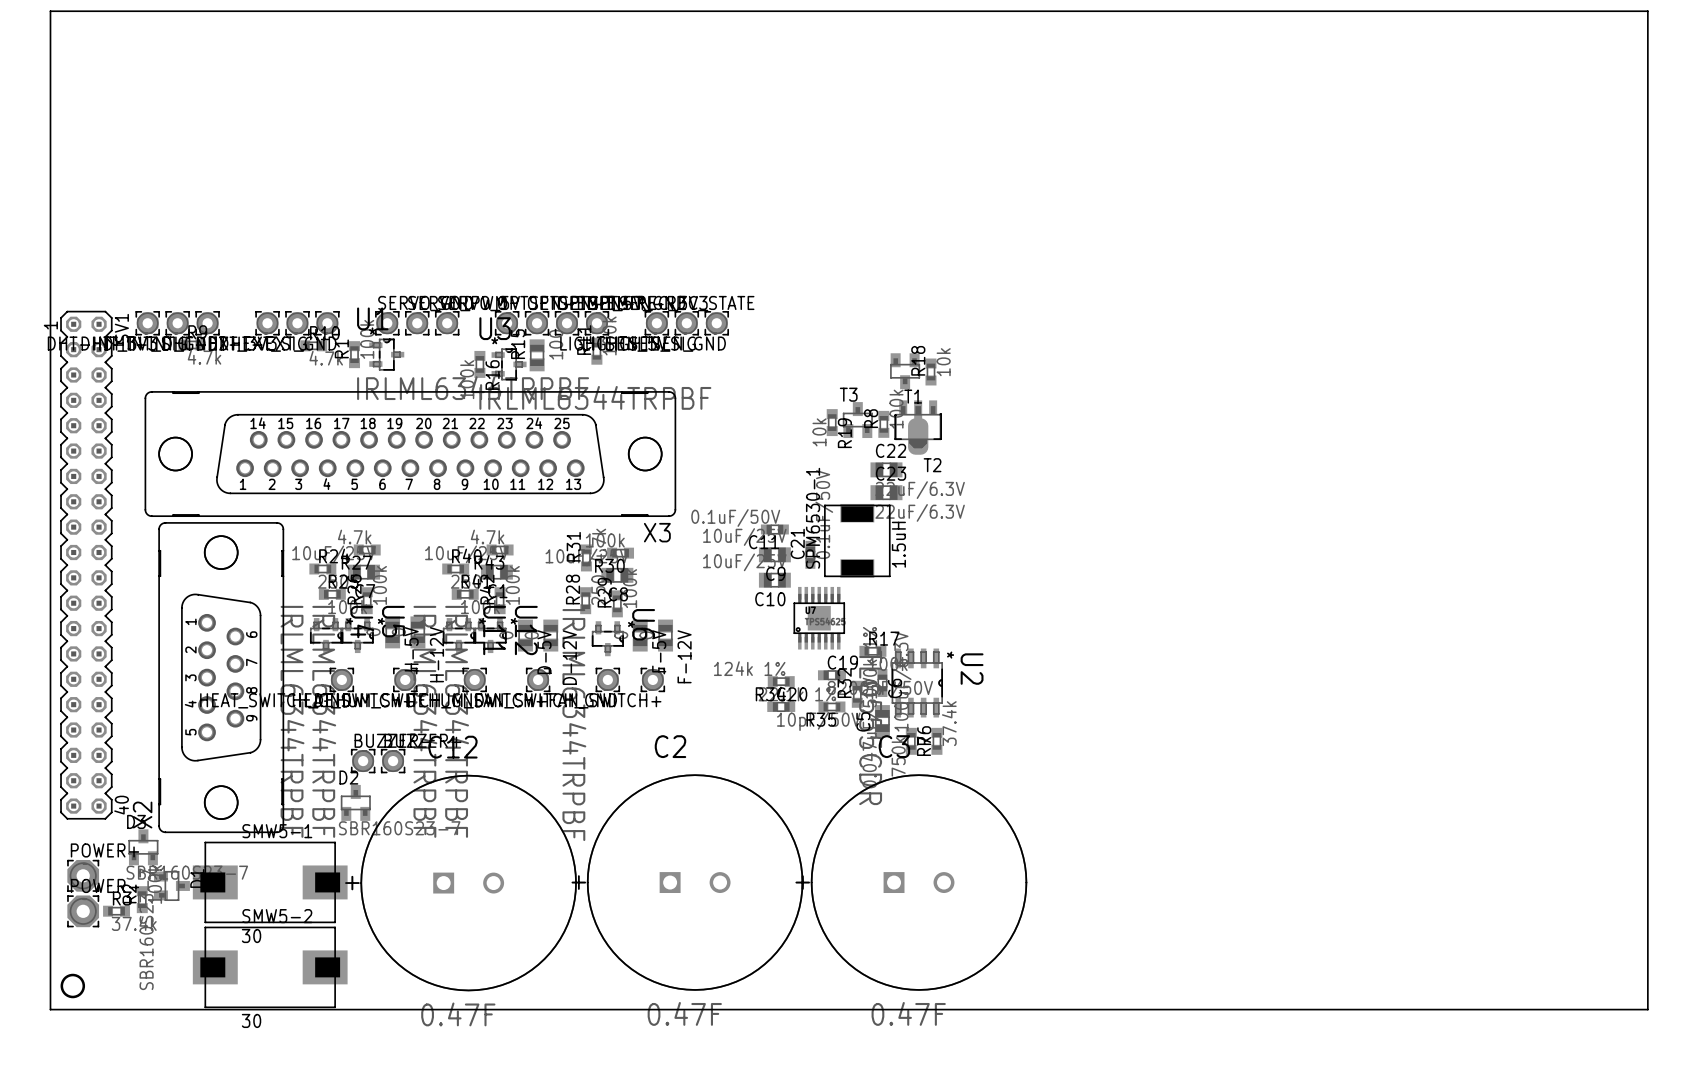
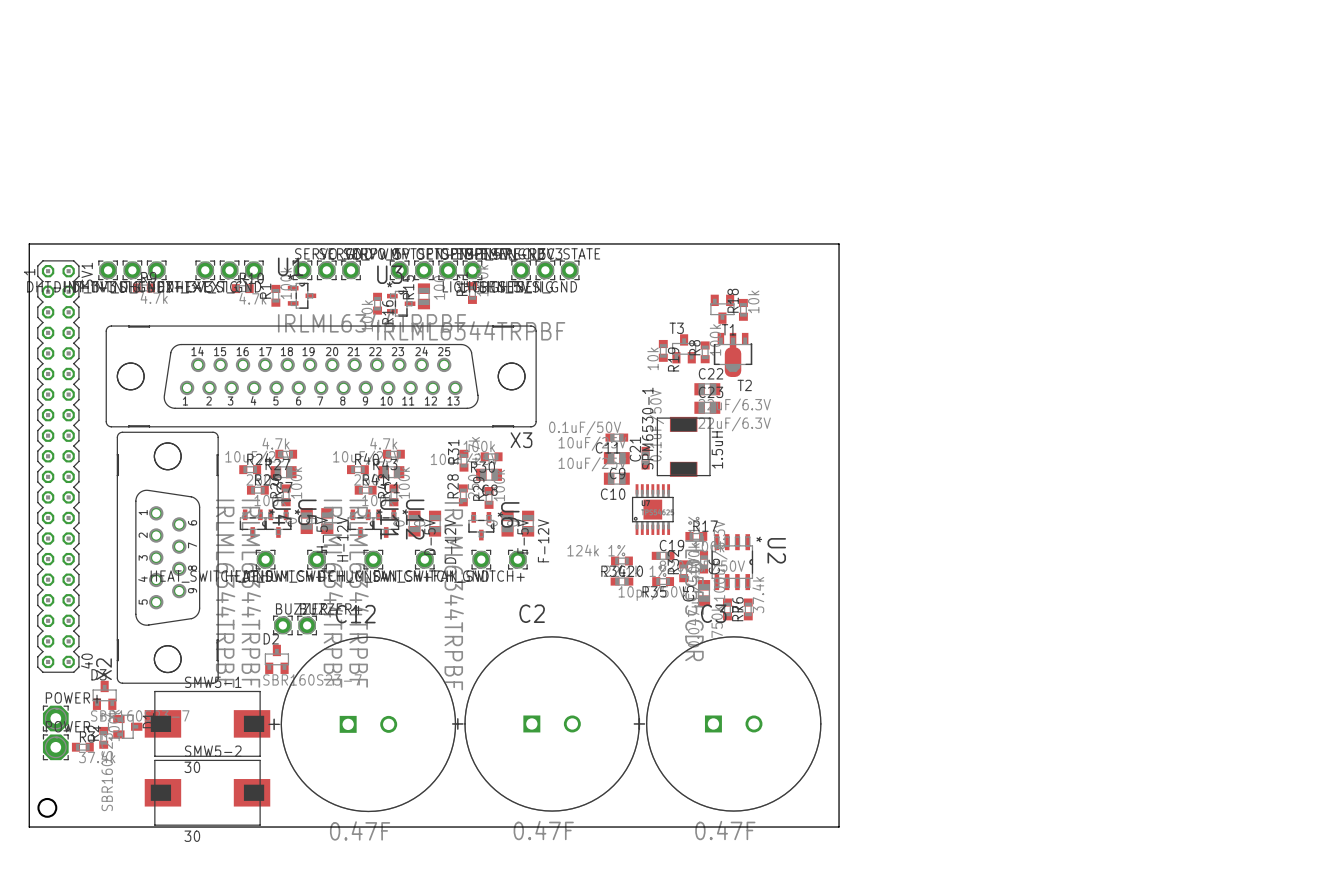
board edge: (50, 290) (50, 11) (1647, 11) (1647, 1009) (1048, 1009) -> (29, 243) (839, 243) (839, 827)

